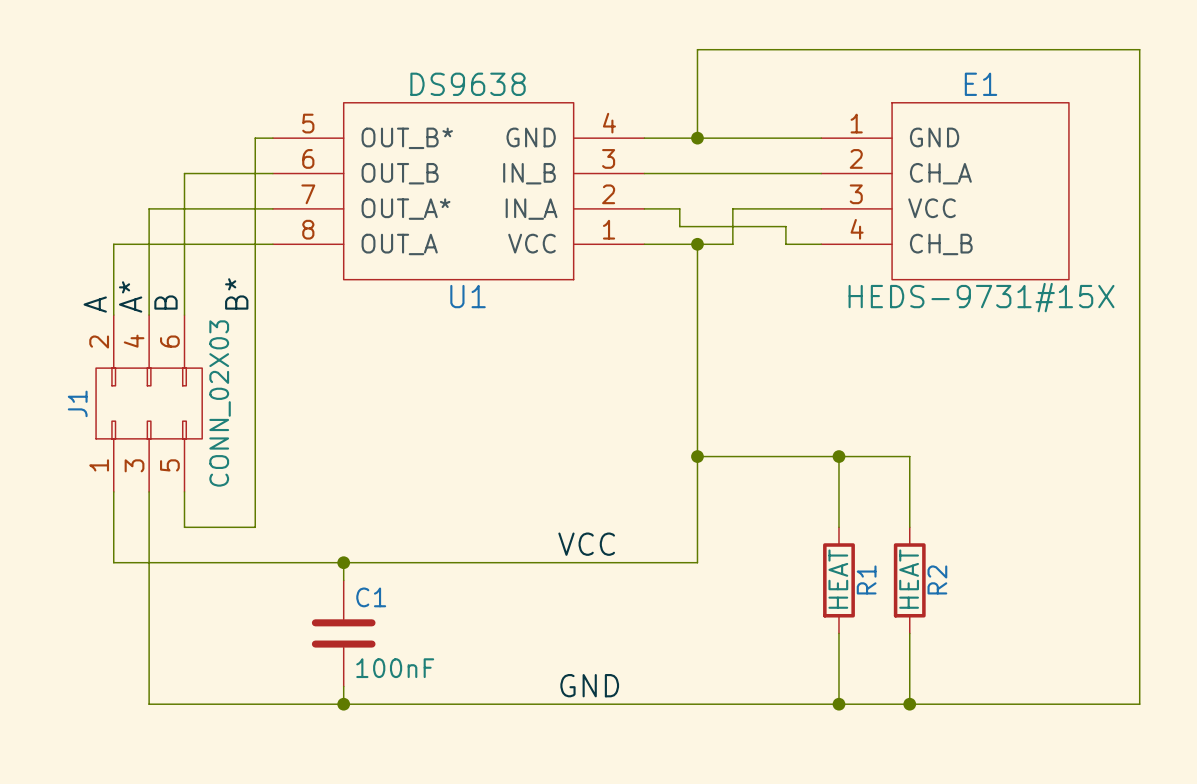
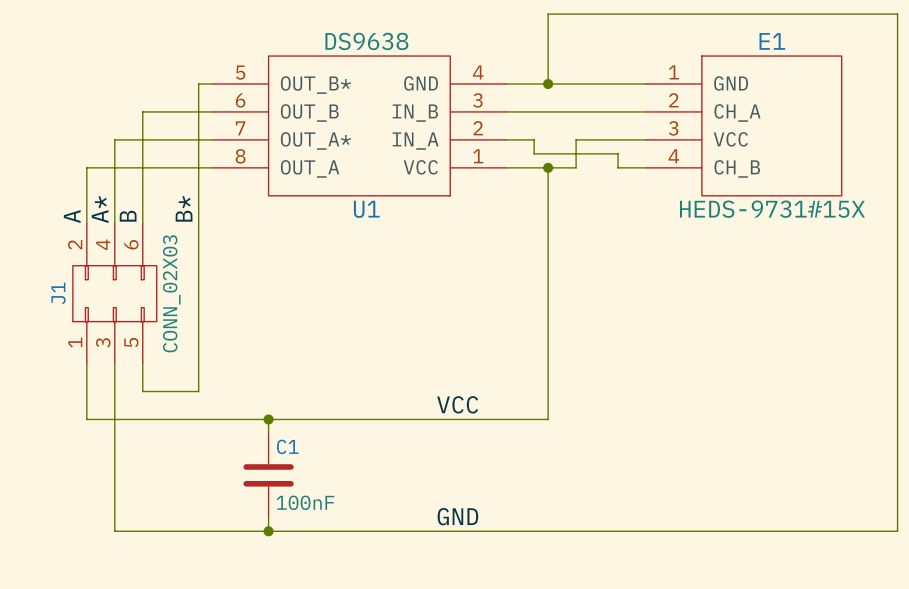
wire: (697, 456) (909, 456) (909, 527) -> none
junction: (697, 456) -> none
wire: (838, 456) (838, 527) -> none
junction: (838, 456) -> none
R1: HEAT (838, 580) -> none
R2: HEAT (909, 580) -> none
wire: (838, 633) (838, 704) -> none
wire: (909, 633) (909, 704) -> none
junction: (838, 704) -> none
junction: (909, 704) -> none

